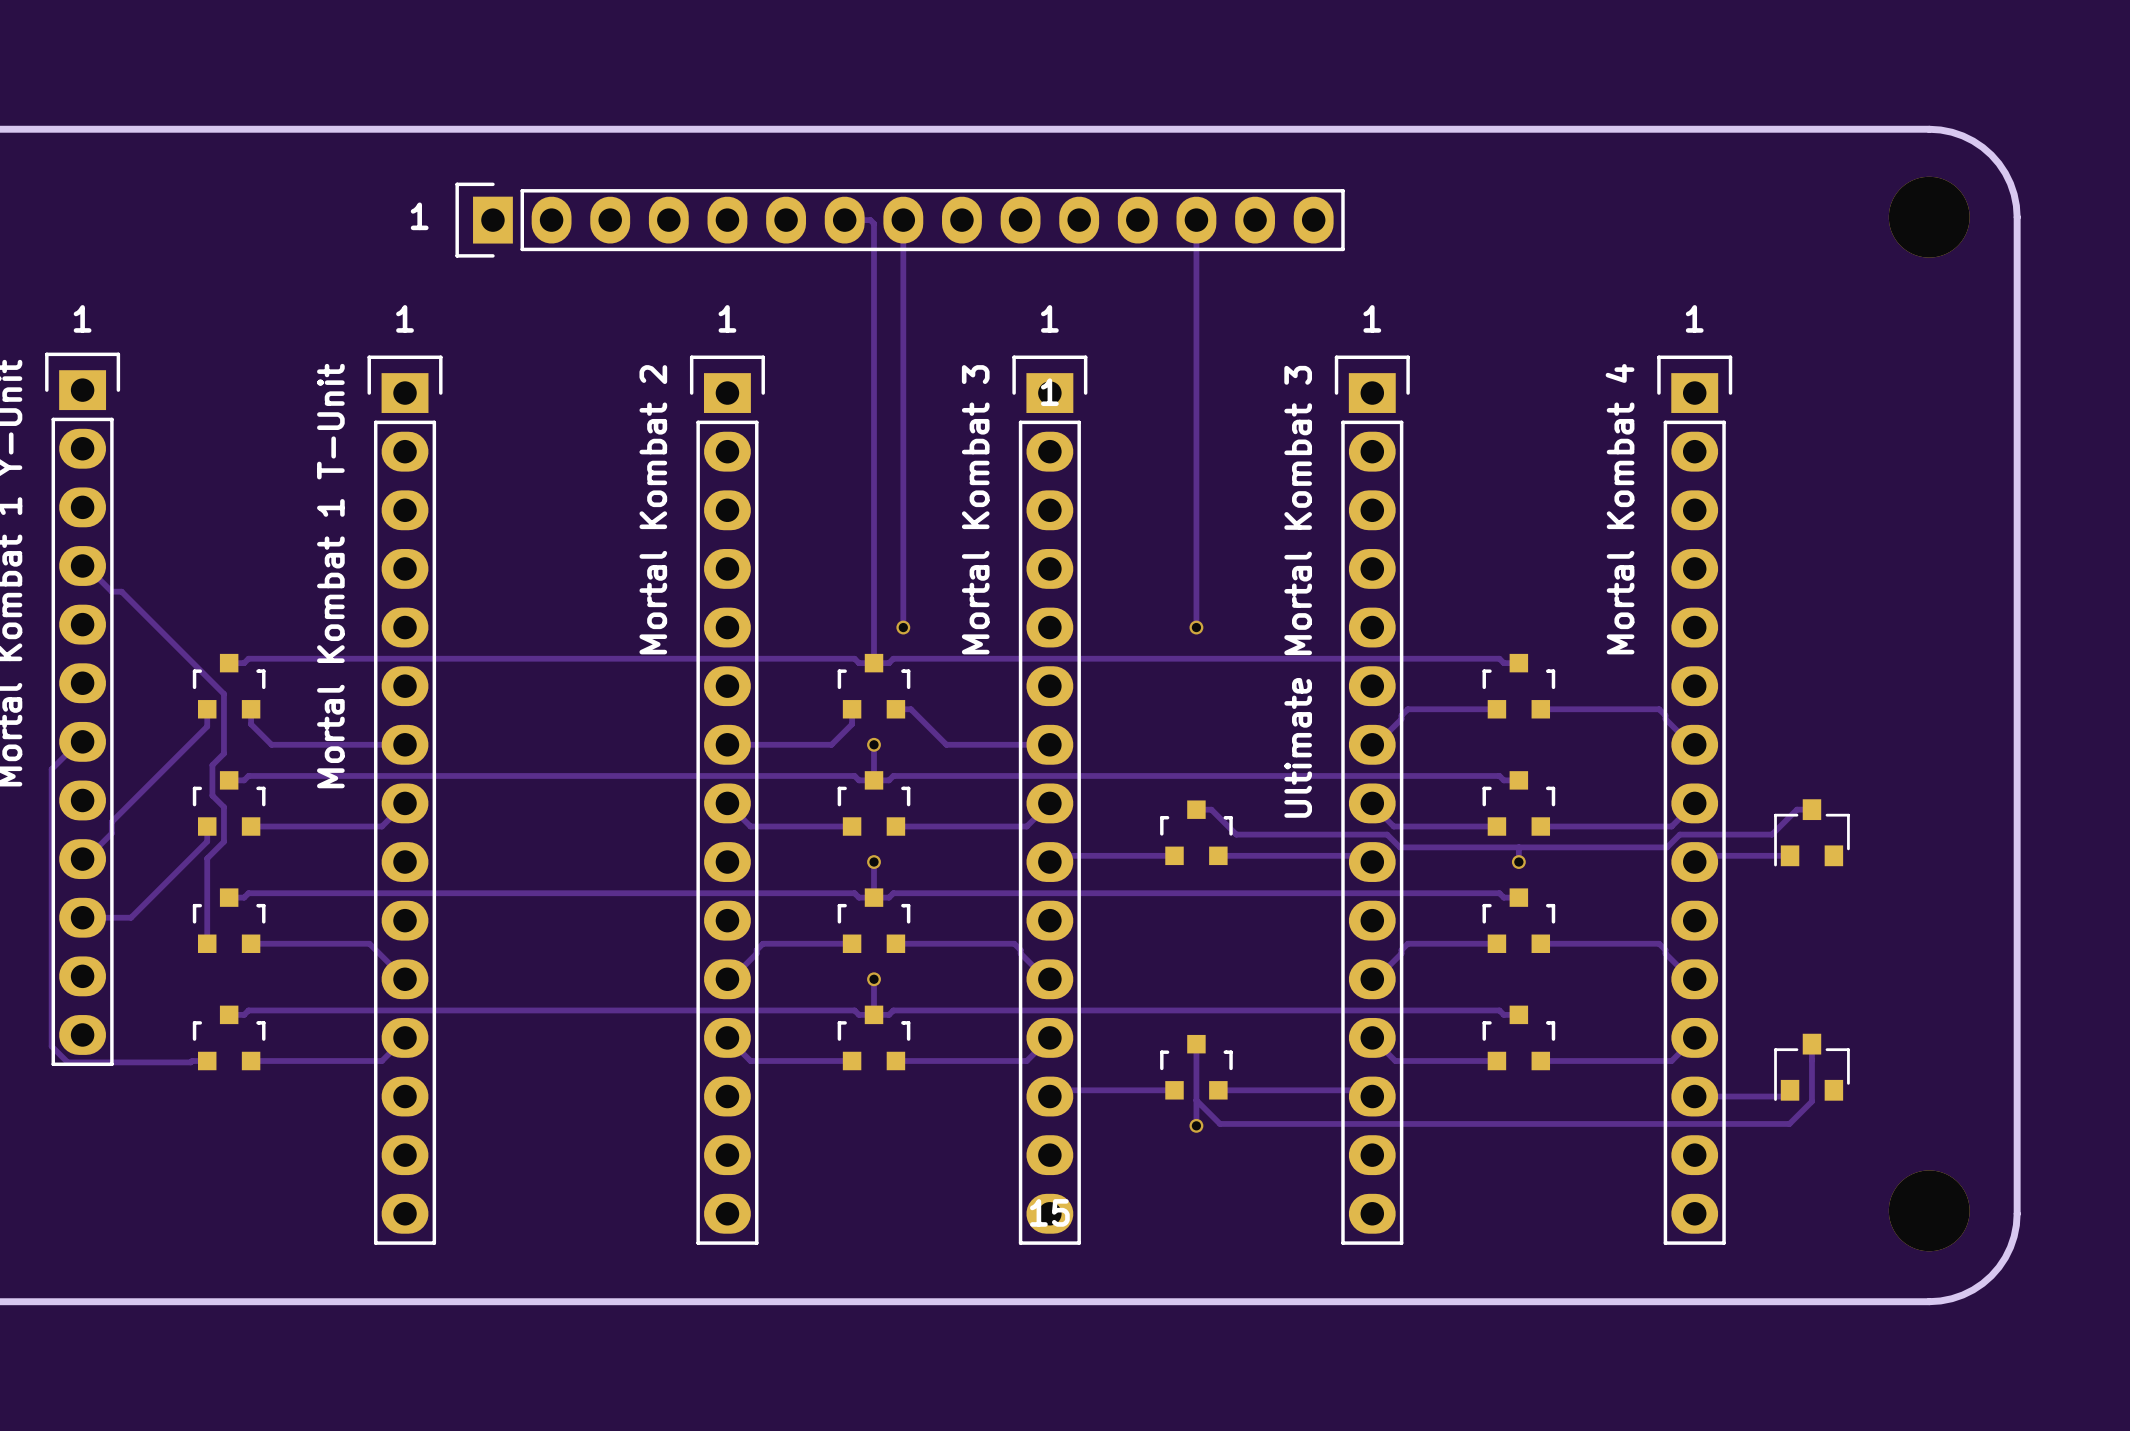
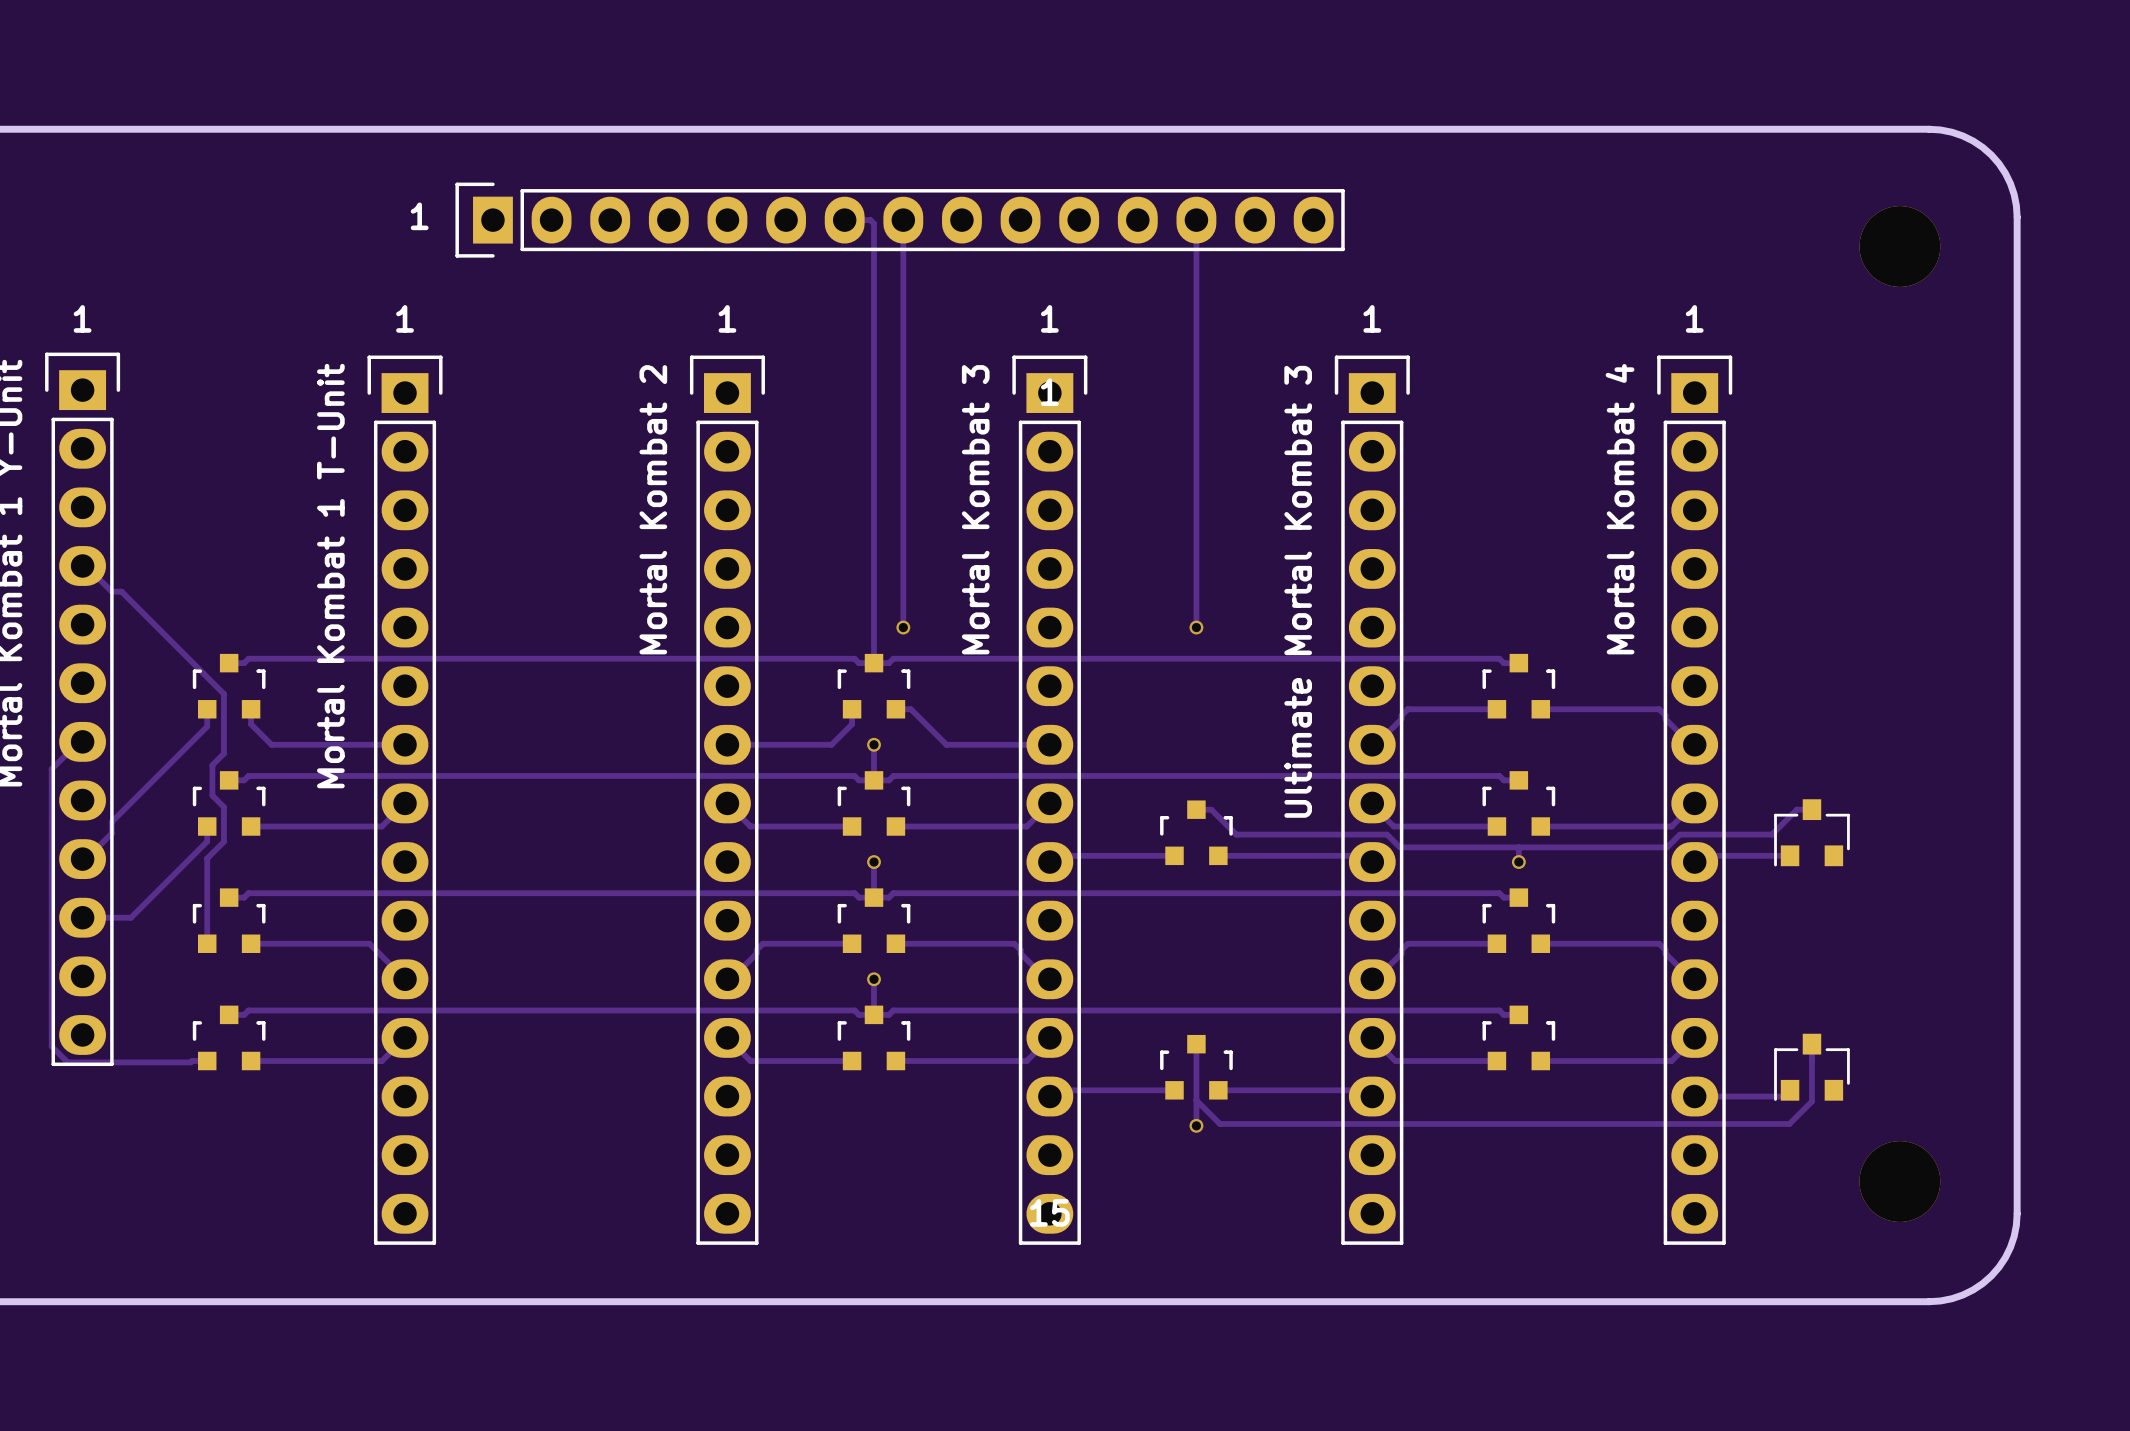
part position: (1929, 217) -> (1899, 246)
part position: (1929, 1210) -> (1899, 1181)

